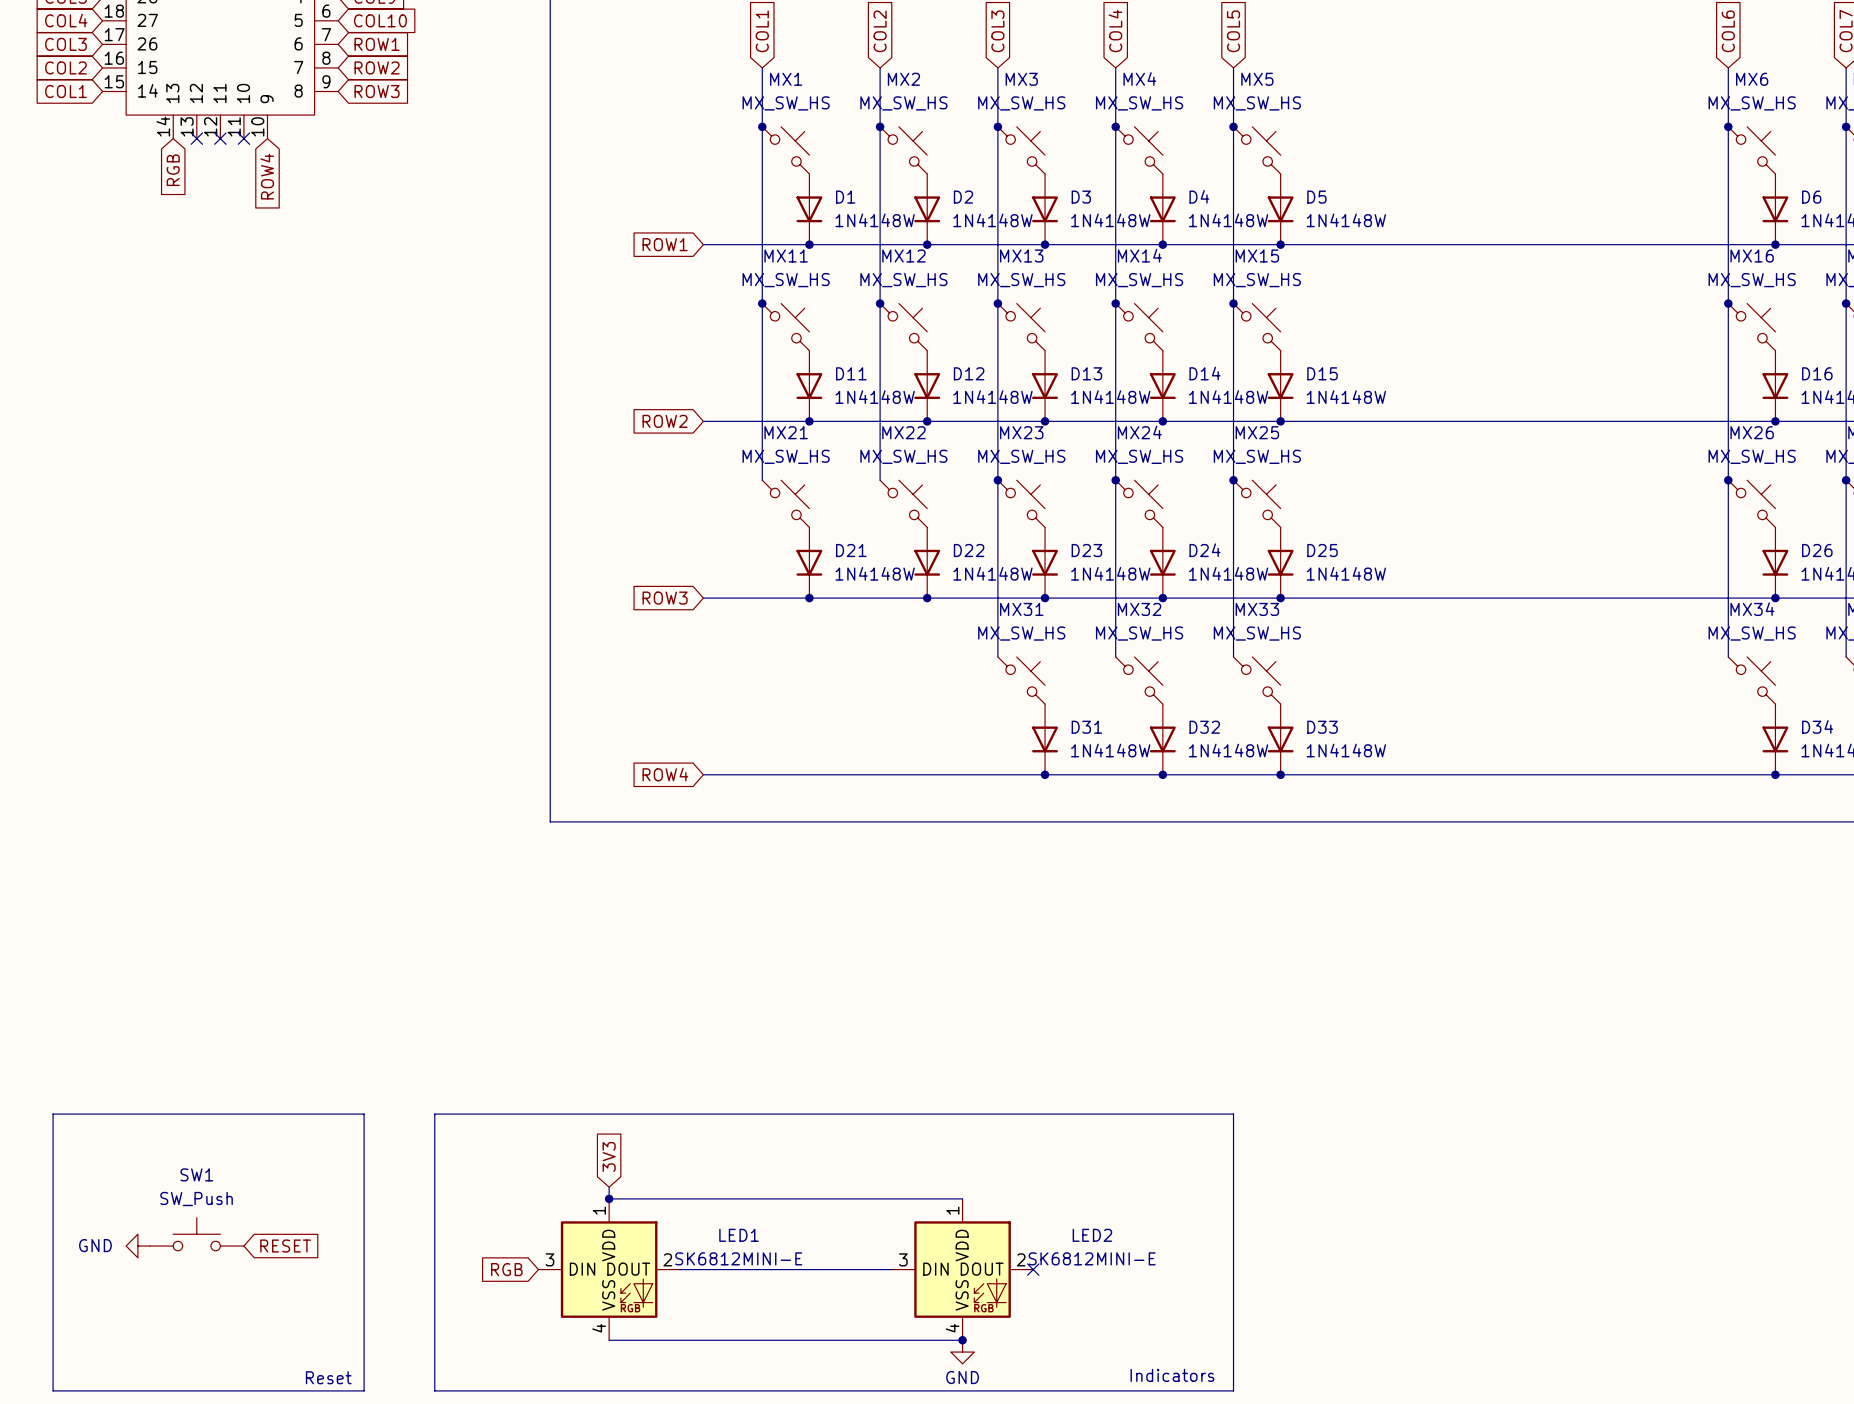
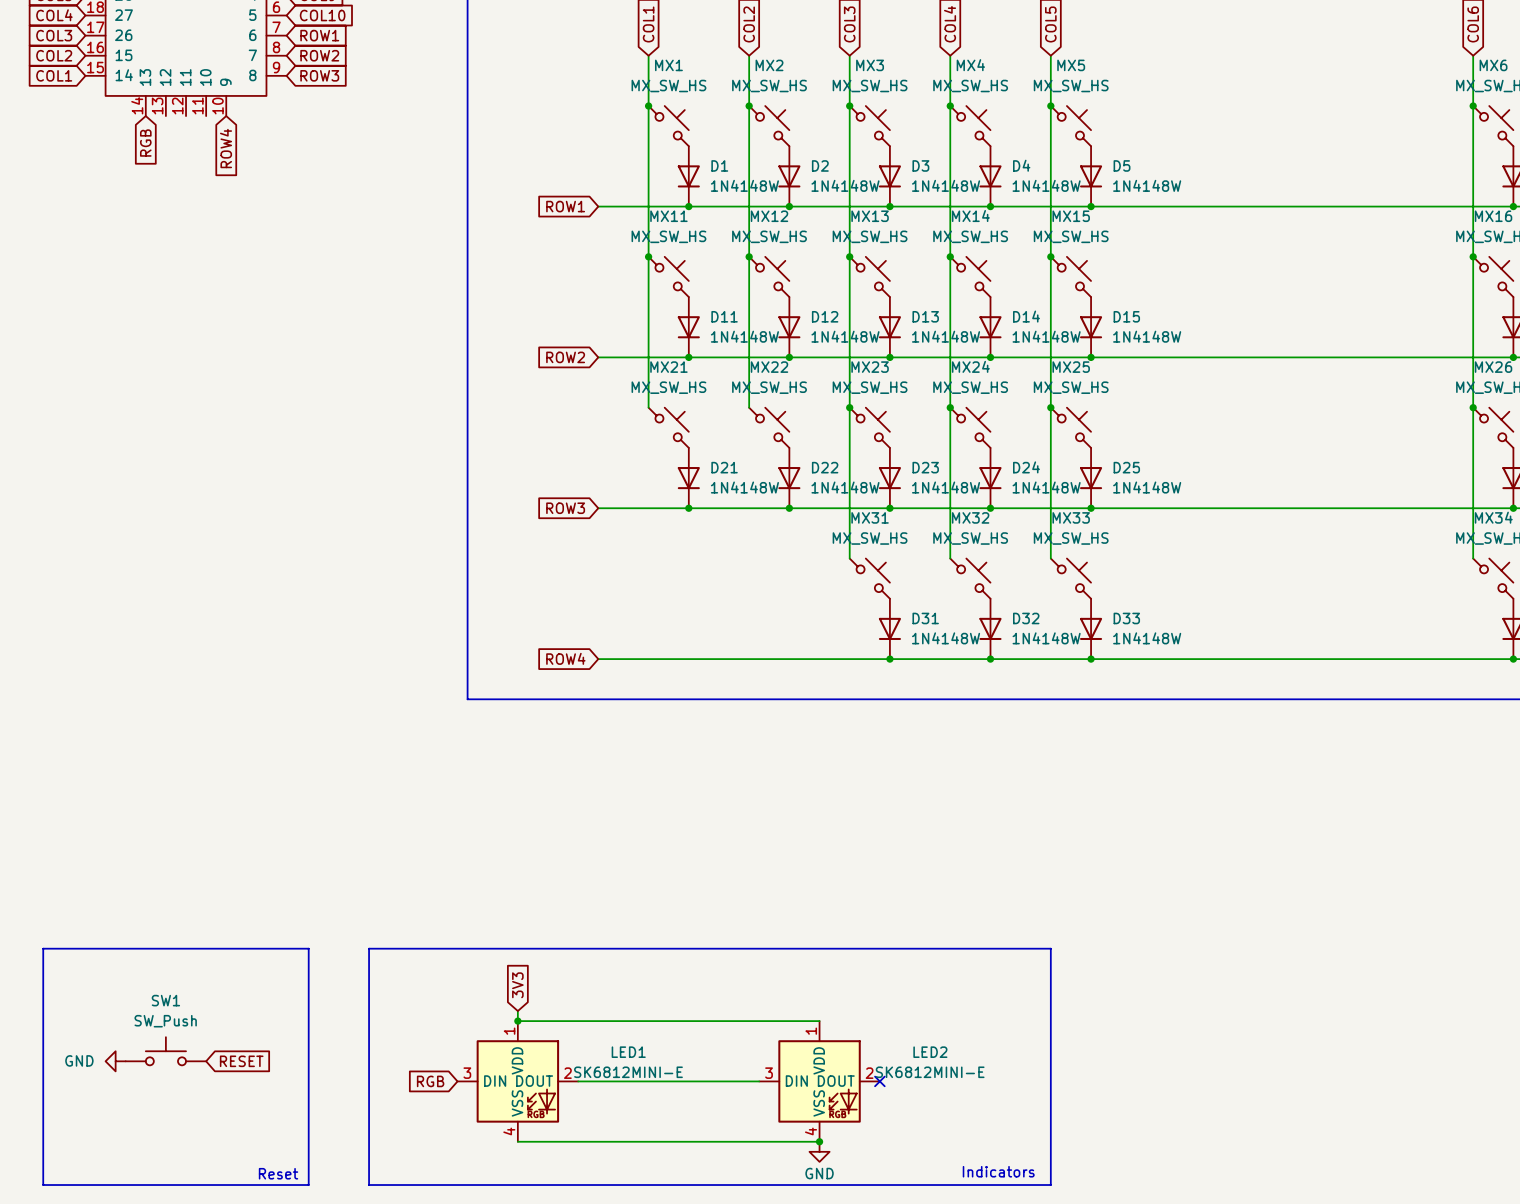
no-connect mark: (196, 138) -> none
no-connect mark: (220, 138) -> none
no-connect mark: (243, 138) -> none

